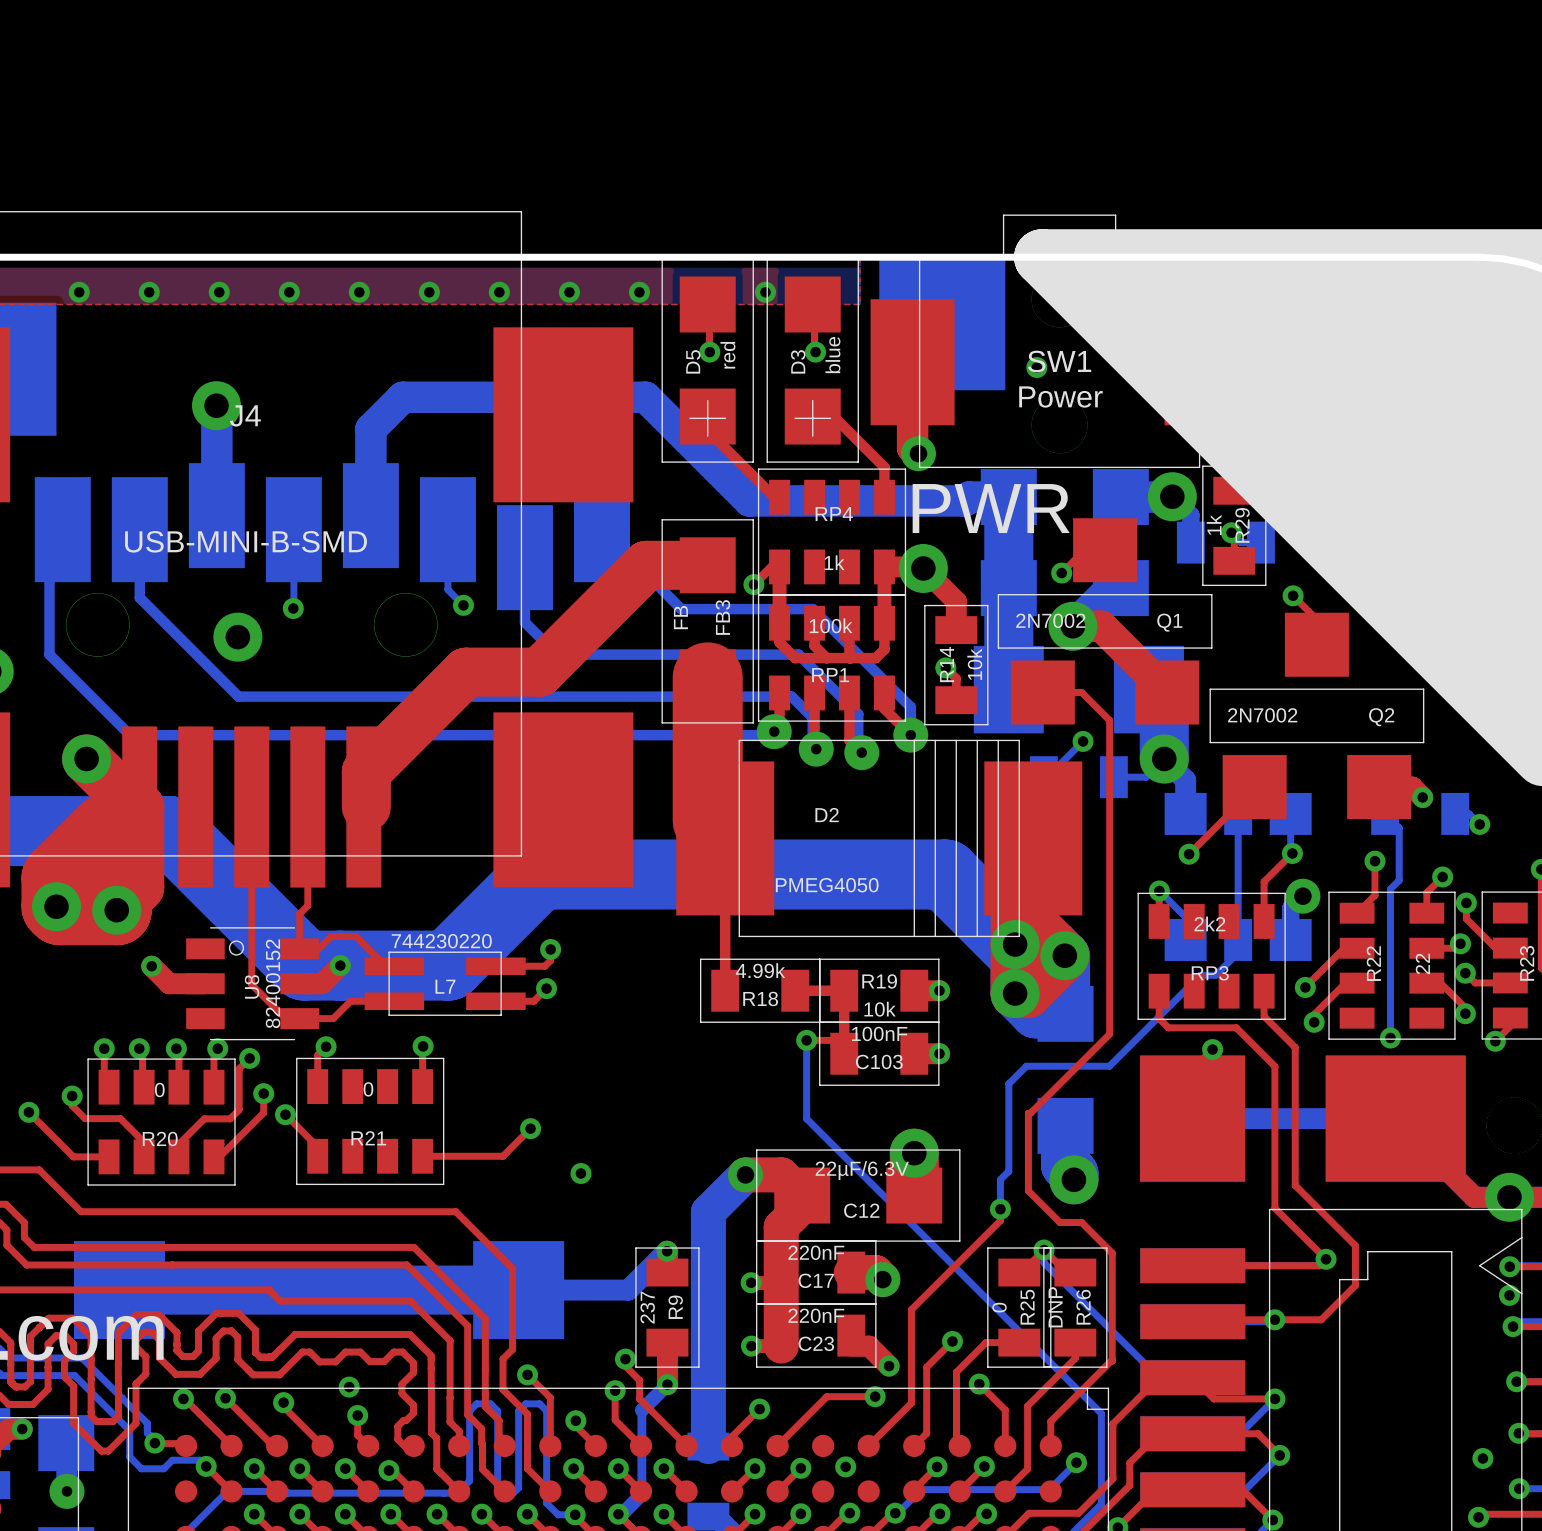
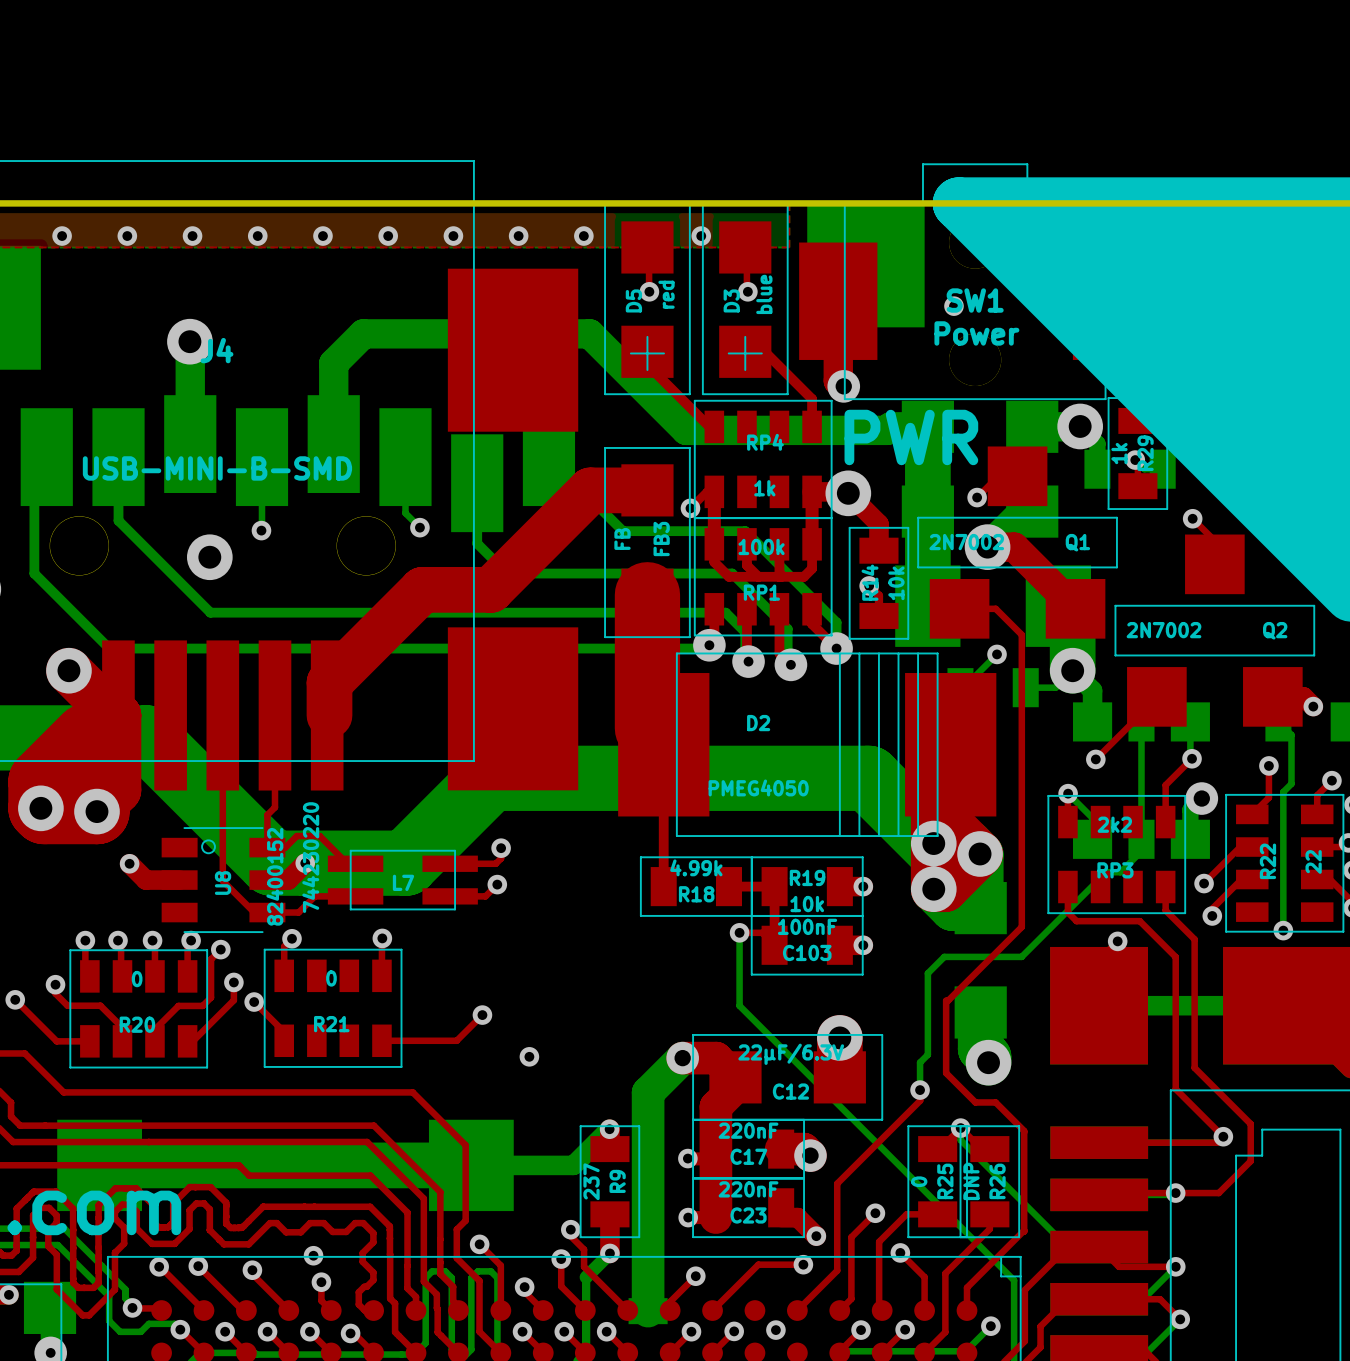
L7 value rotation: 0° (441, 941) -> 90° counterclockwise (310, 857)
U8 value position: 82400152 (273, 983) -> 82400152 (274, 876)

